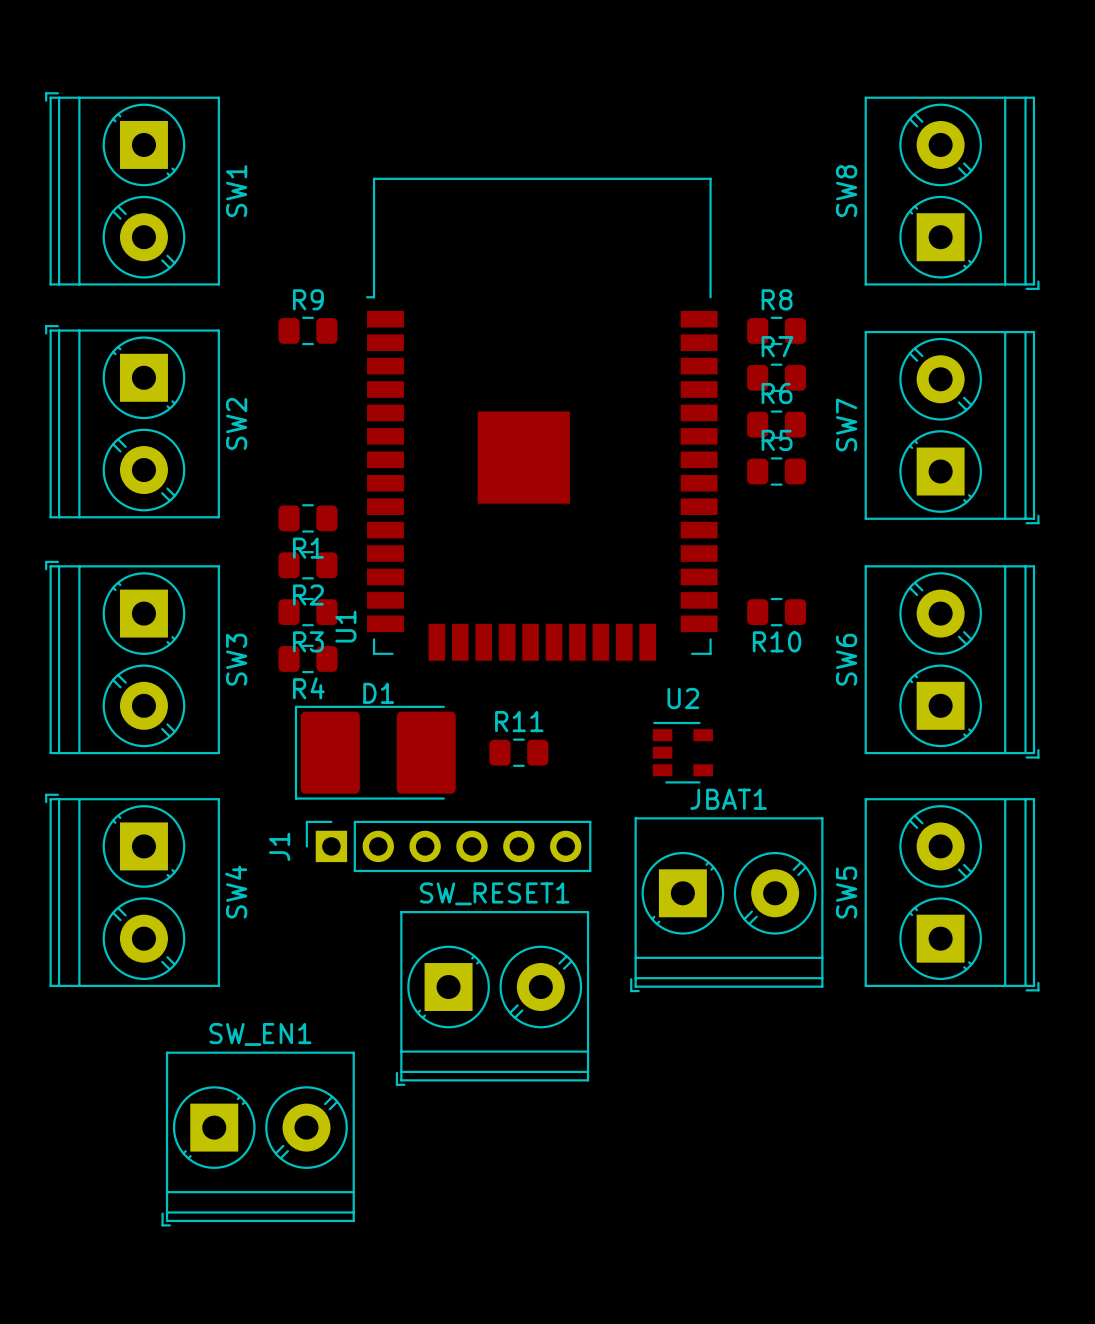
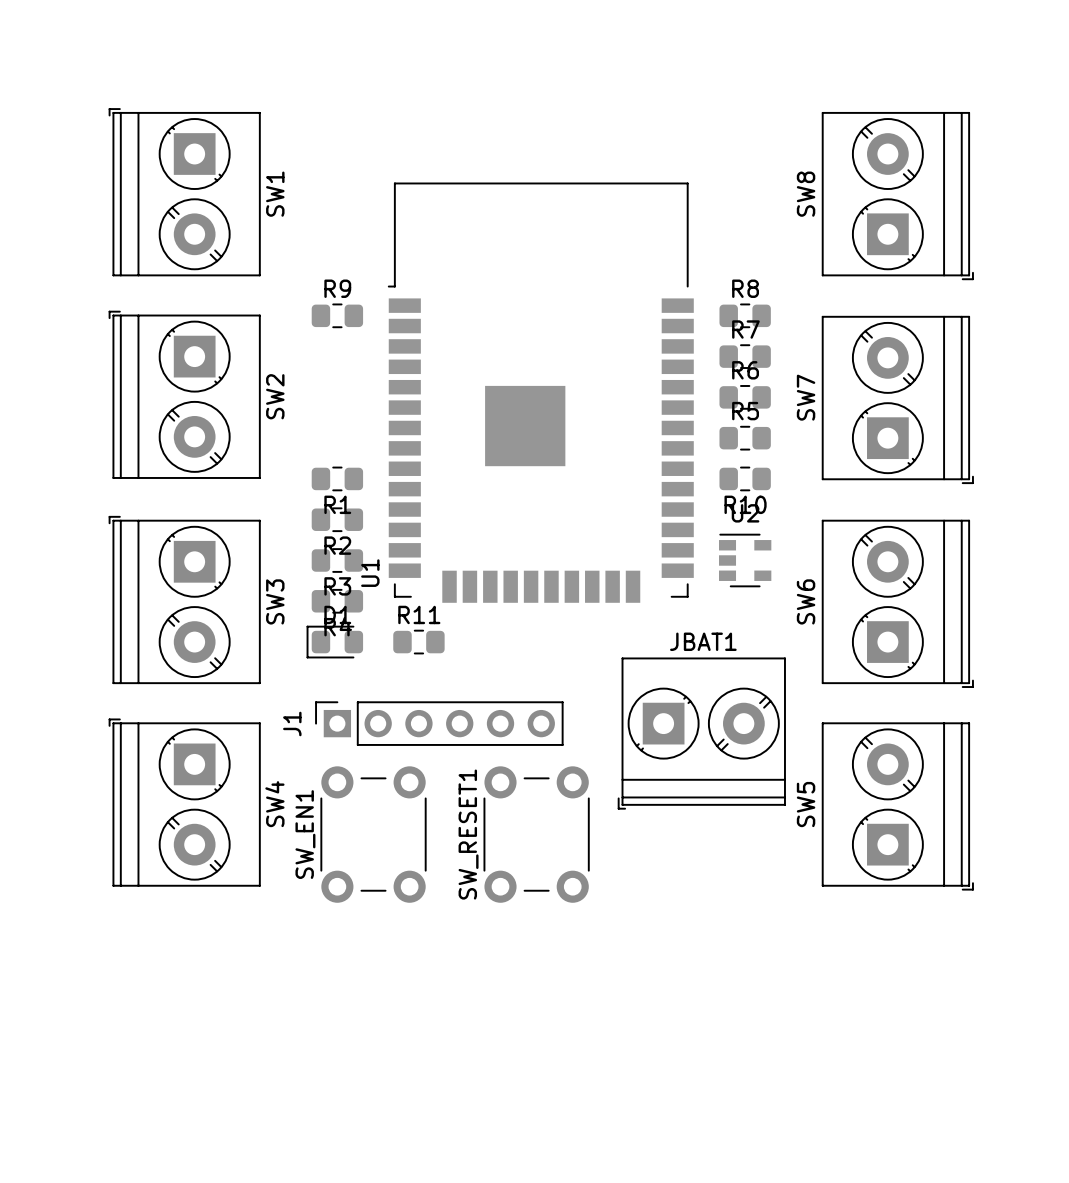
R10 position: (776, 612) -> (745, 478)
D1 footprint: [294, 705, 456, 800] -> [306, 625, 364, 659]
R11 position: (518, 752) -> (418, 642)
U2 position: (682, 752) -> (745, 560)
J1 position: (448, 846) -> (439, 723)
SW_RESET1 name position: SW_RESET1 (494, 893) -> SW_RESET1 (468, 834)
JBAT1 position: (726, 904) -> (701, 733)
SW_RESET1 footprint: [395, 911, 590, 1086] -> [483, 766, 590, 903]
SW_EN1 name position: SW_EN1 (260, 1034) -> SW_EN1 (305, 834)
SW_EN1 footprint: [161, 1051, 355, 1227] -> [320, 766, 427, 903]

